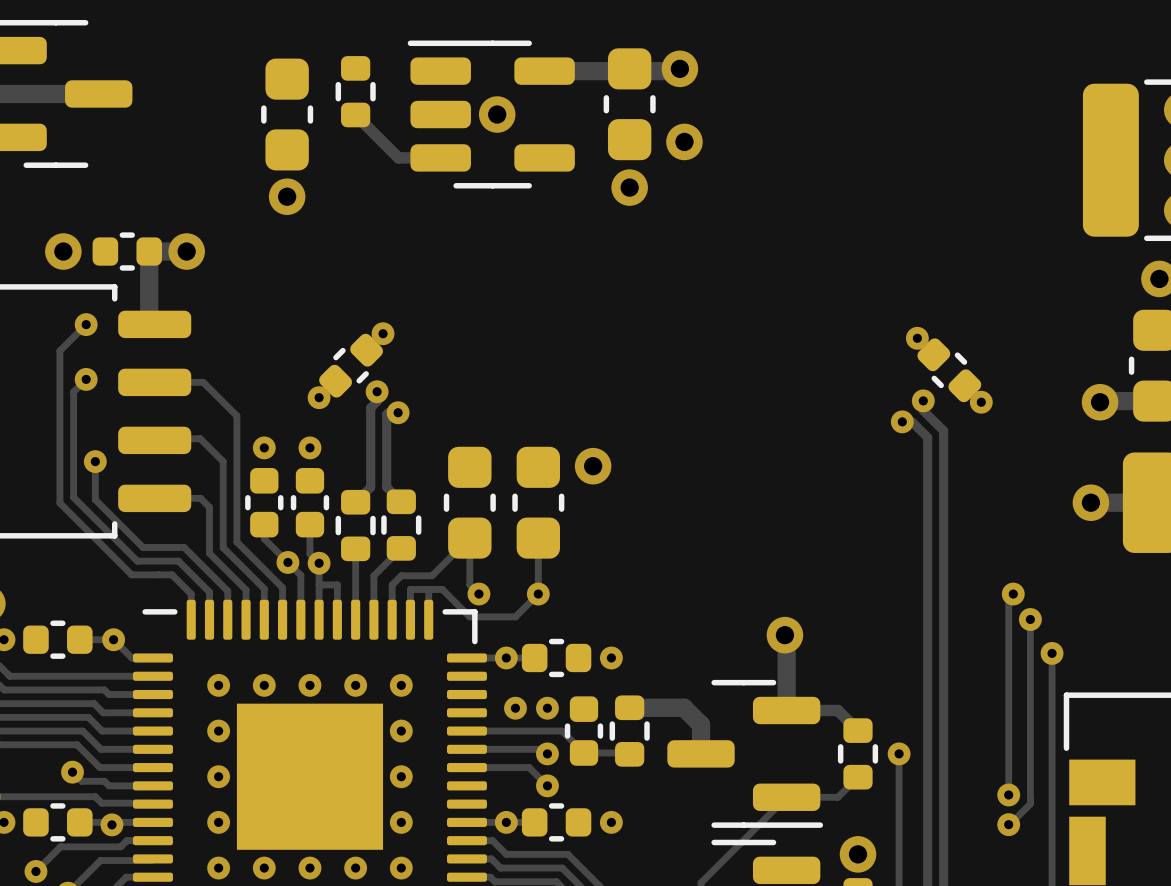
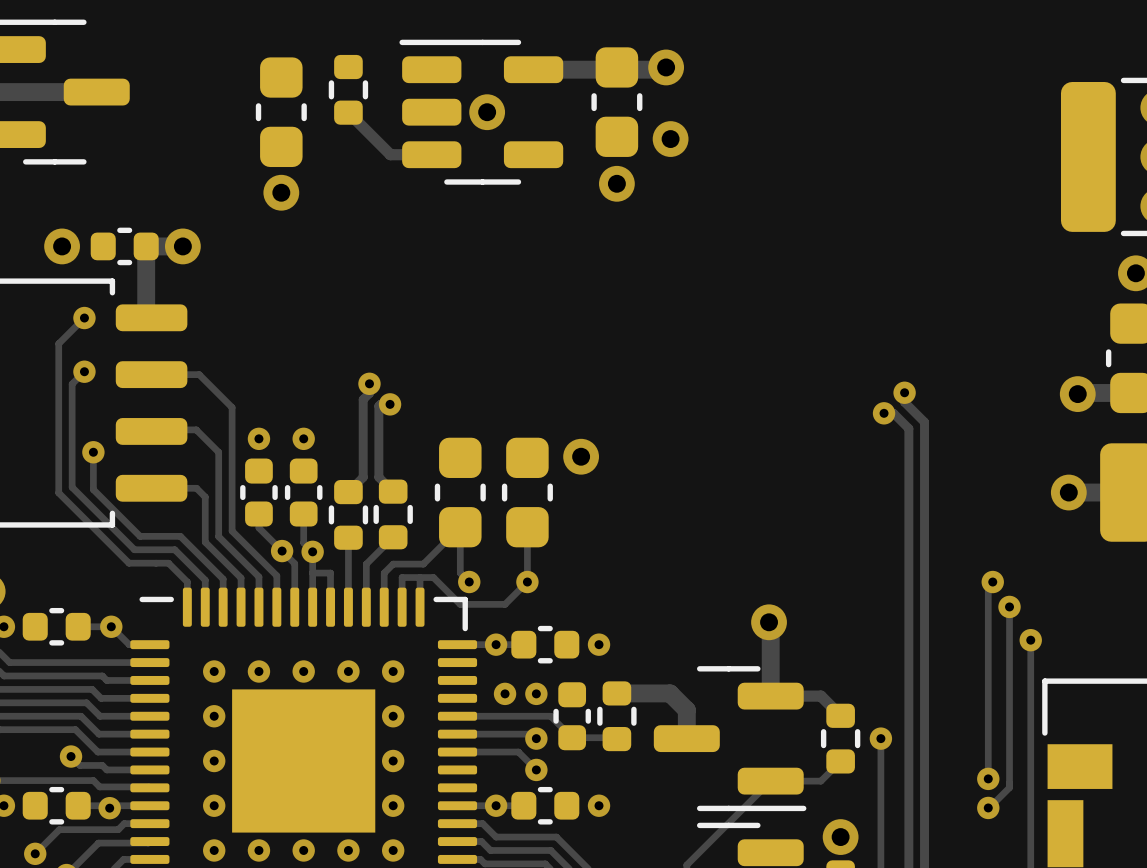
via: (383, 333) -> none
via: (917, 338) -> none
part: (351, 365) -> none
part: (949, 370) -> none
via: (319, 397) -> none
via: (981, 402) -> none

